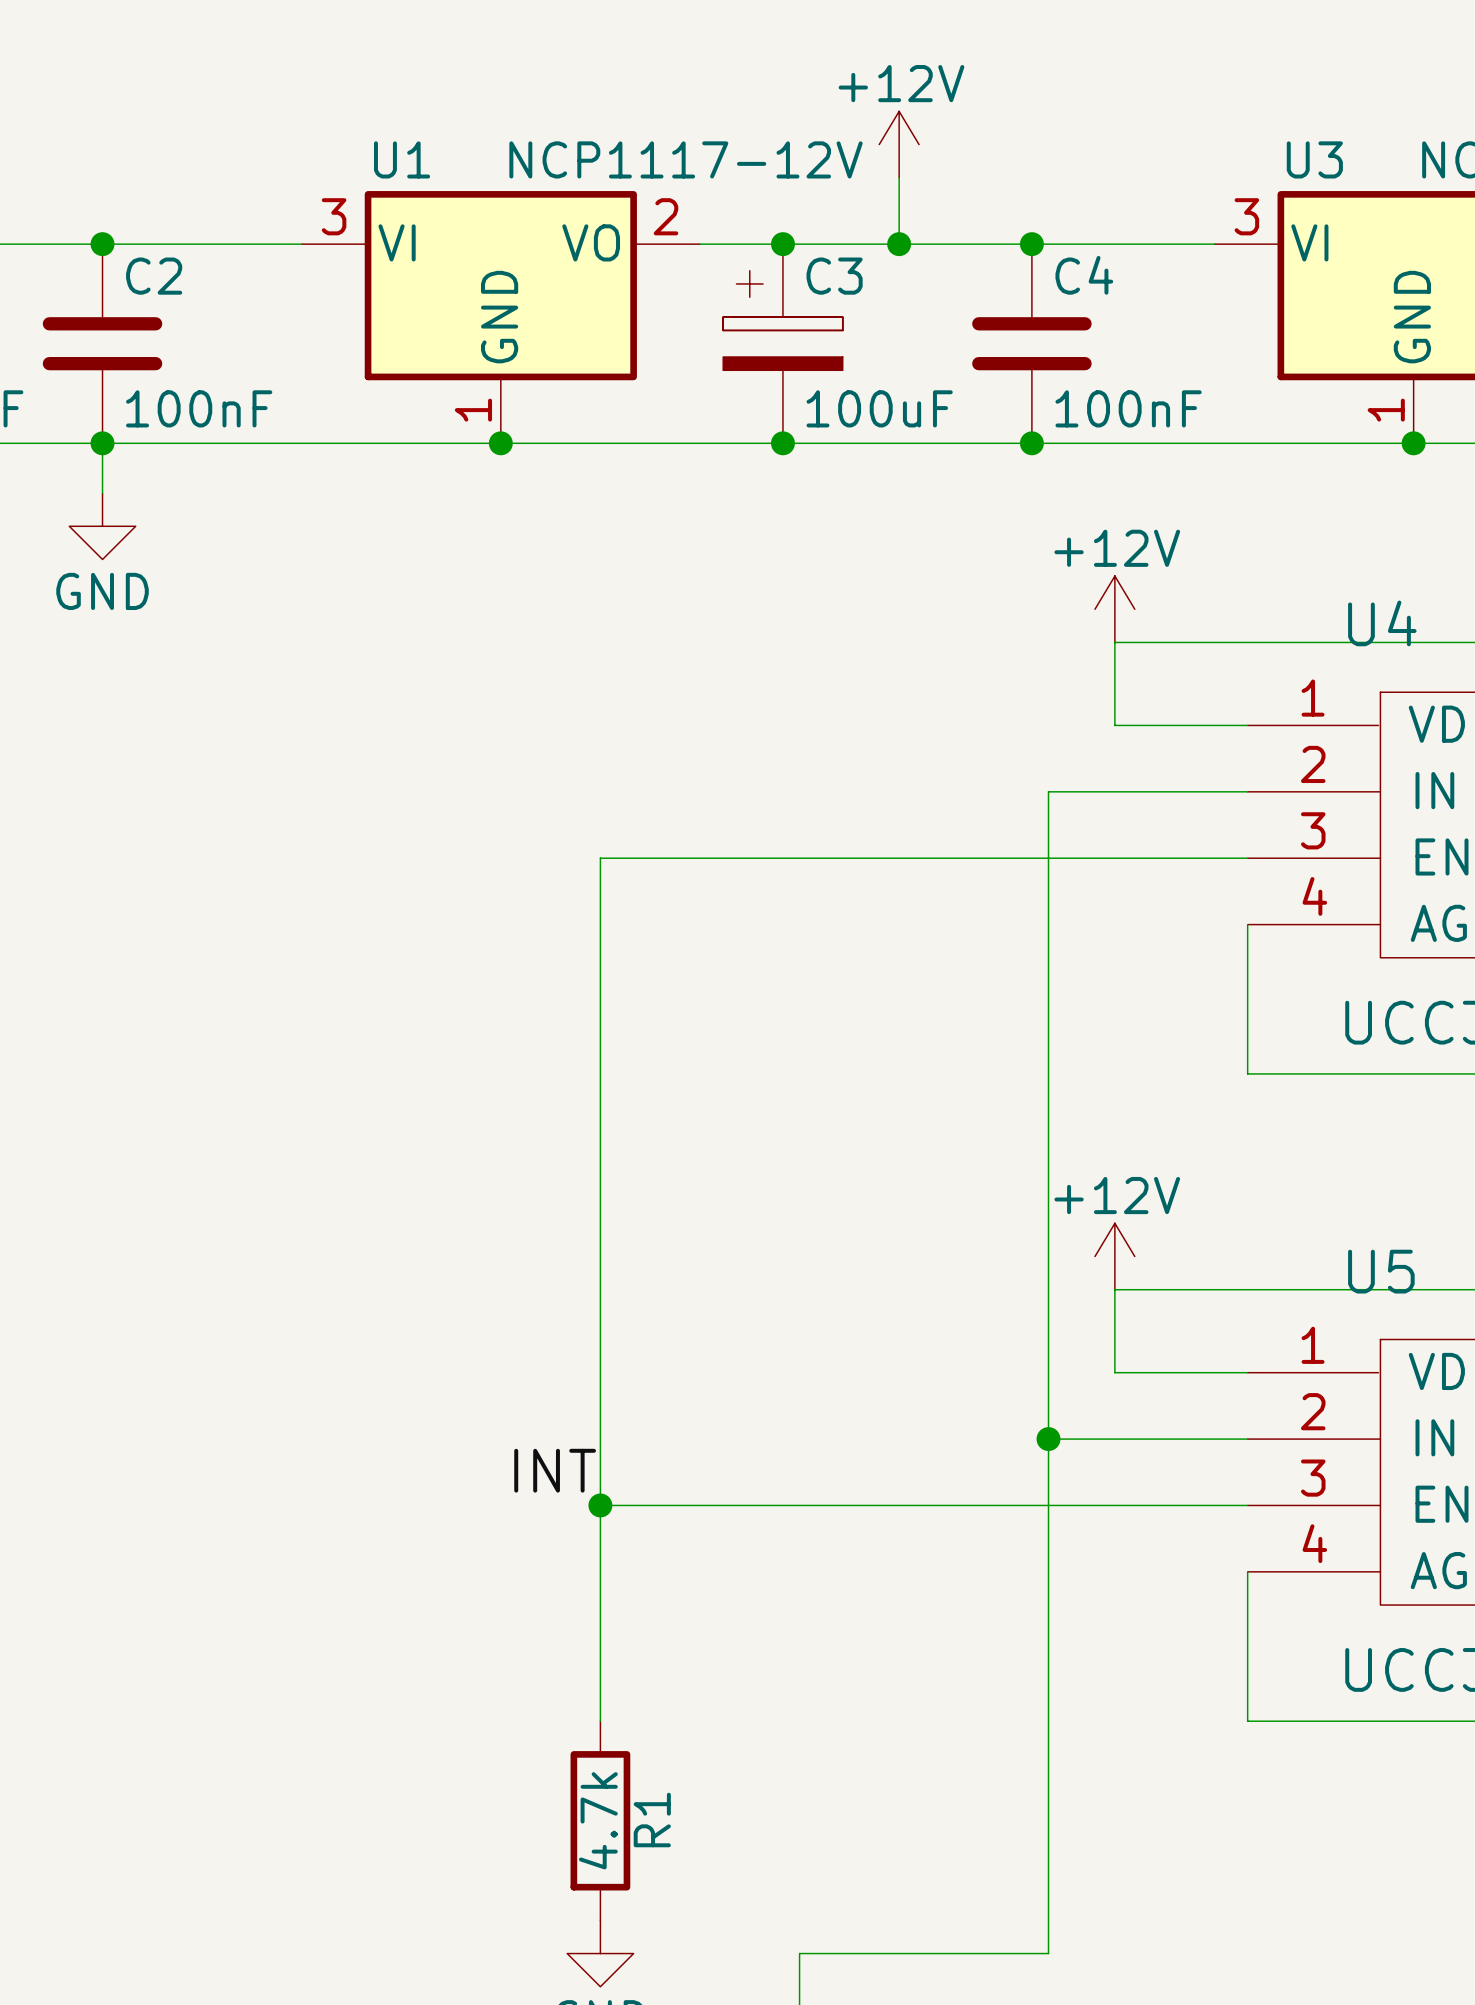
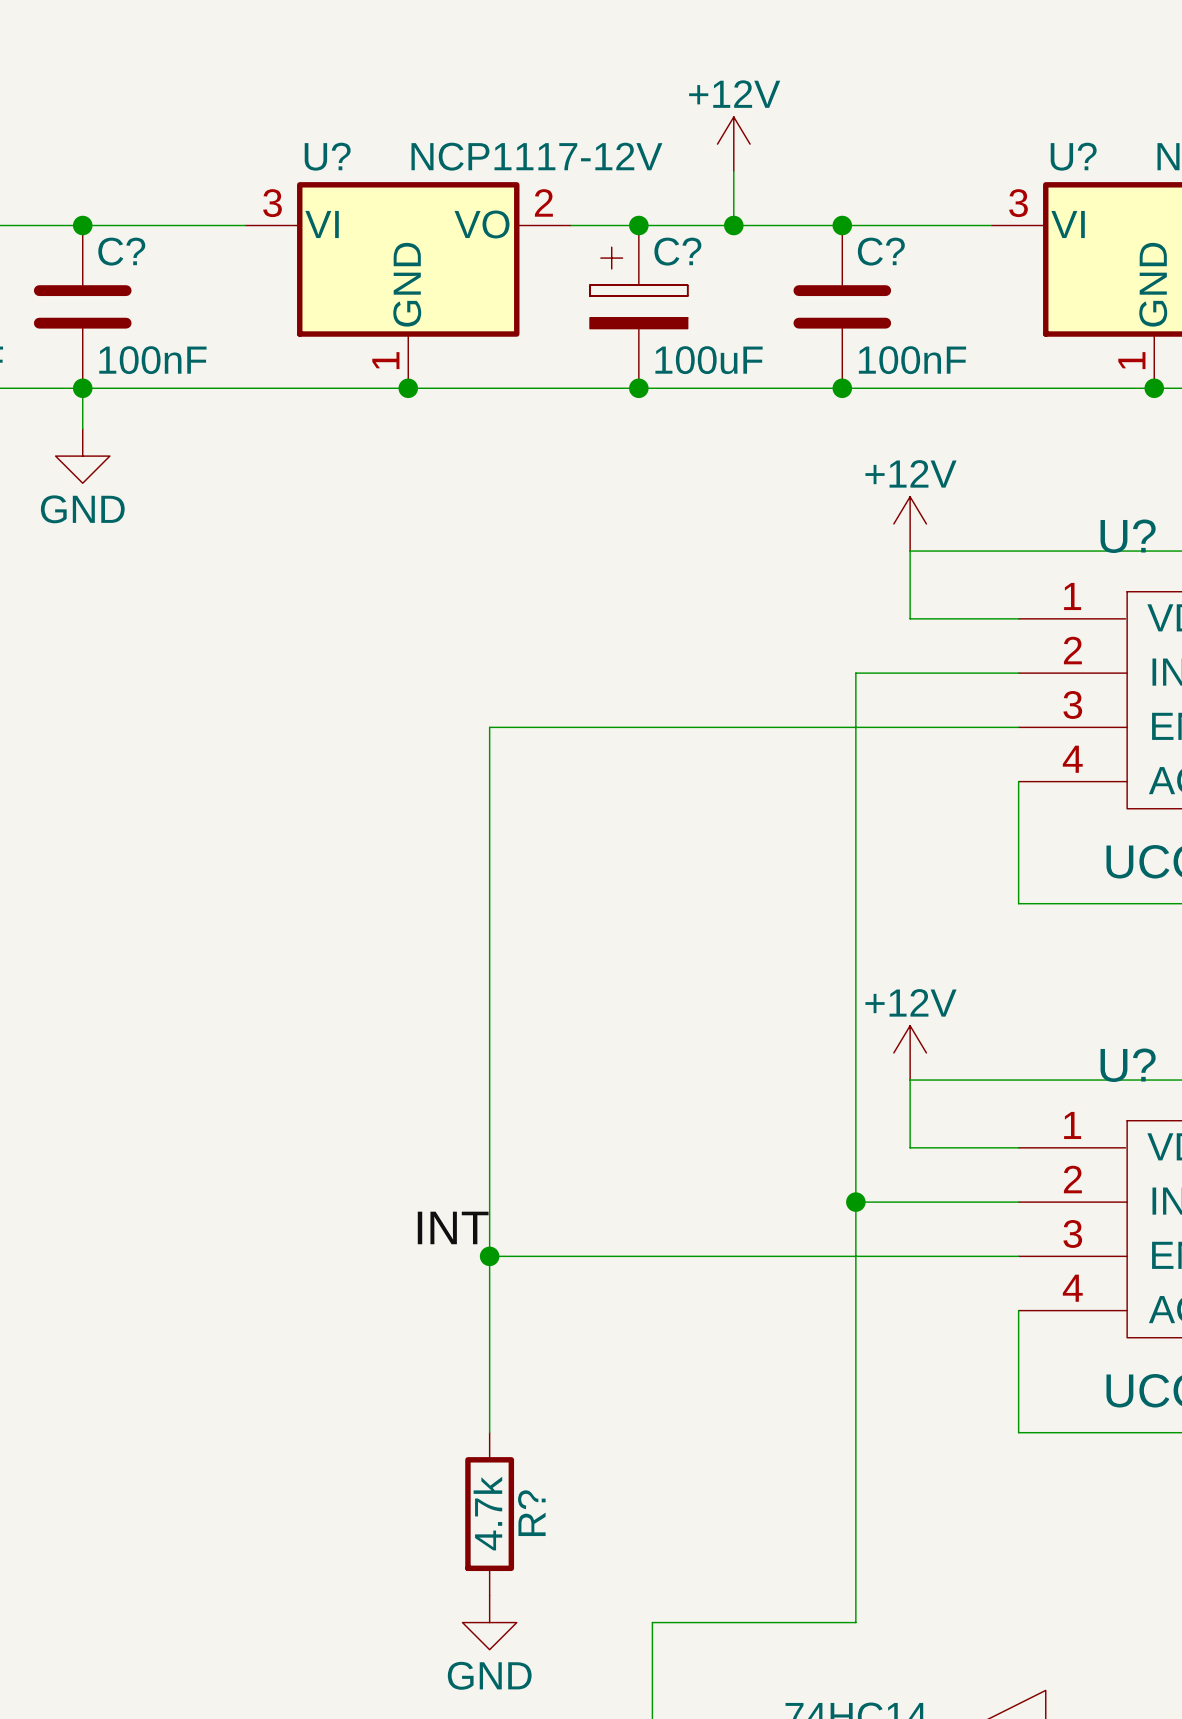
U1 name: U1 (402, 159) -> U? (327, 156)
U3 name: U3 (1314, 159) -> U? (1073, 156)
C4 name: C4 (1084, 275) -> C? (881, 251)
C2 name: C2 (154, 276) -> C? (121, 251)
C3 name: C3 (834, 276) -> C? (677, 251)
U4 name: U4 (1382, 623) -> U? (1128, 536)
U5 name: U5 (1381, 1271) -> U? (1128, 1065)
R1 name: R1 (652, 1819) -> R? (531, 1513)

